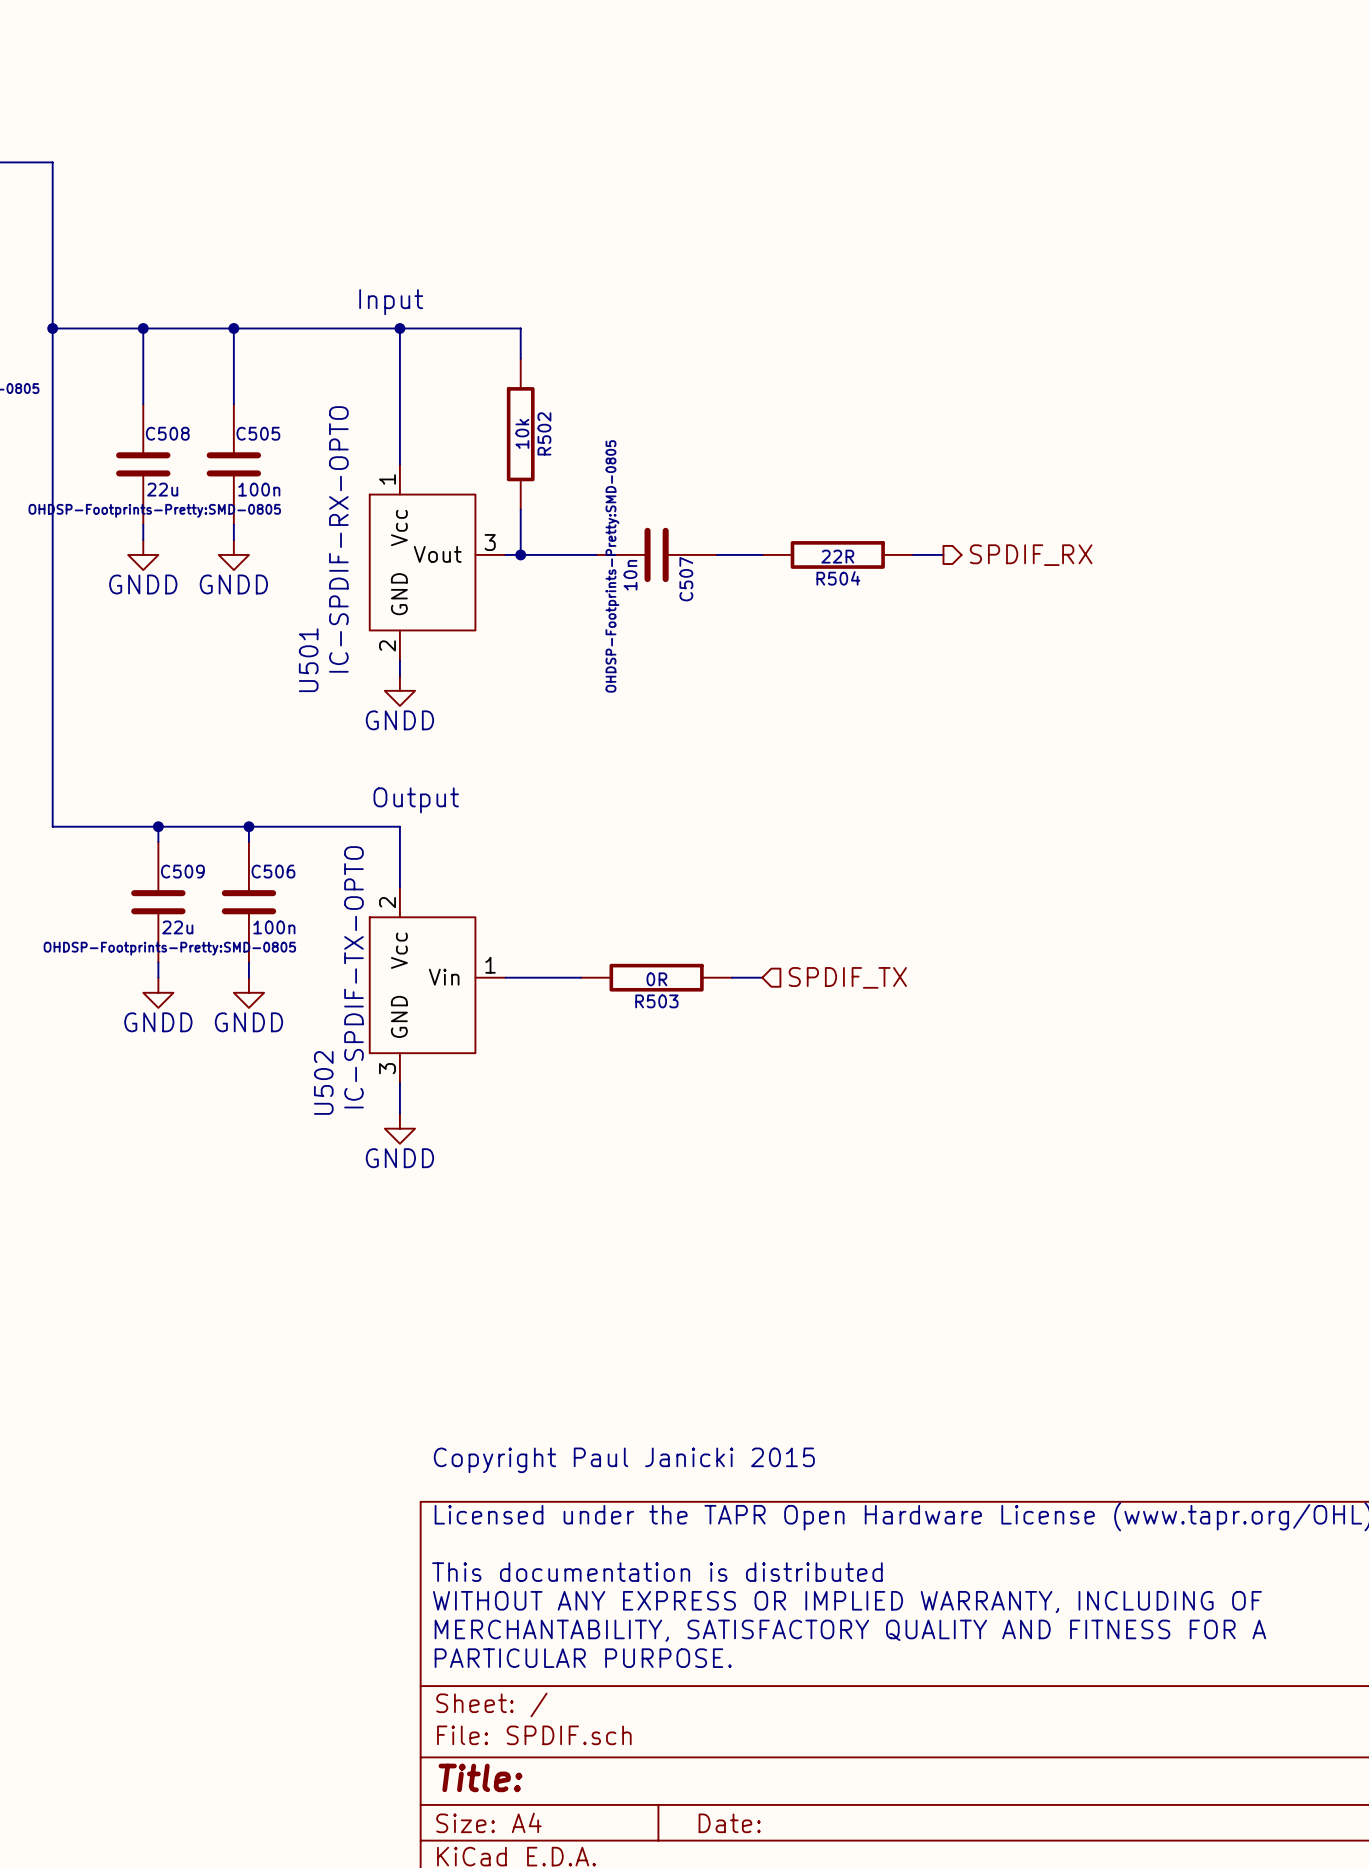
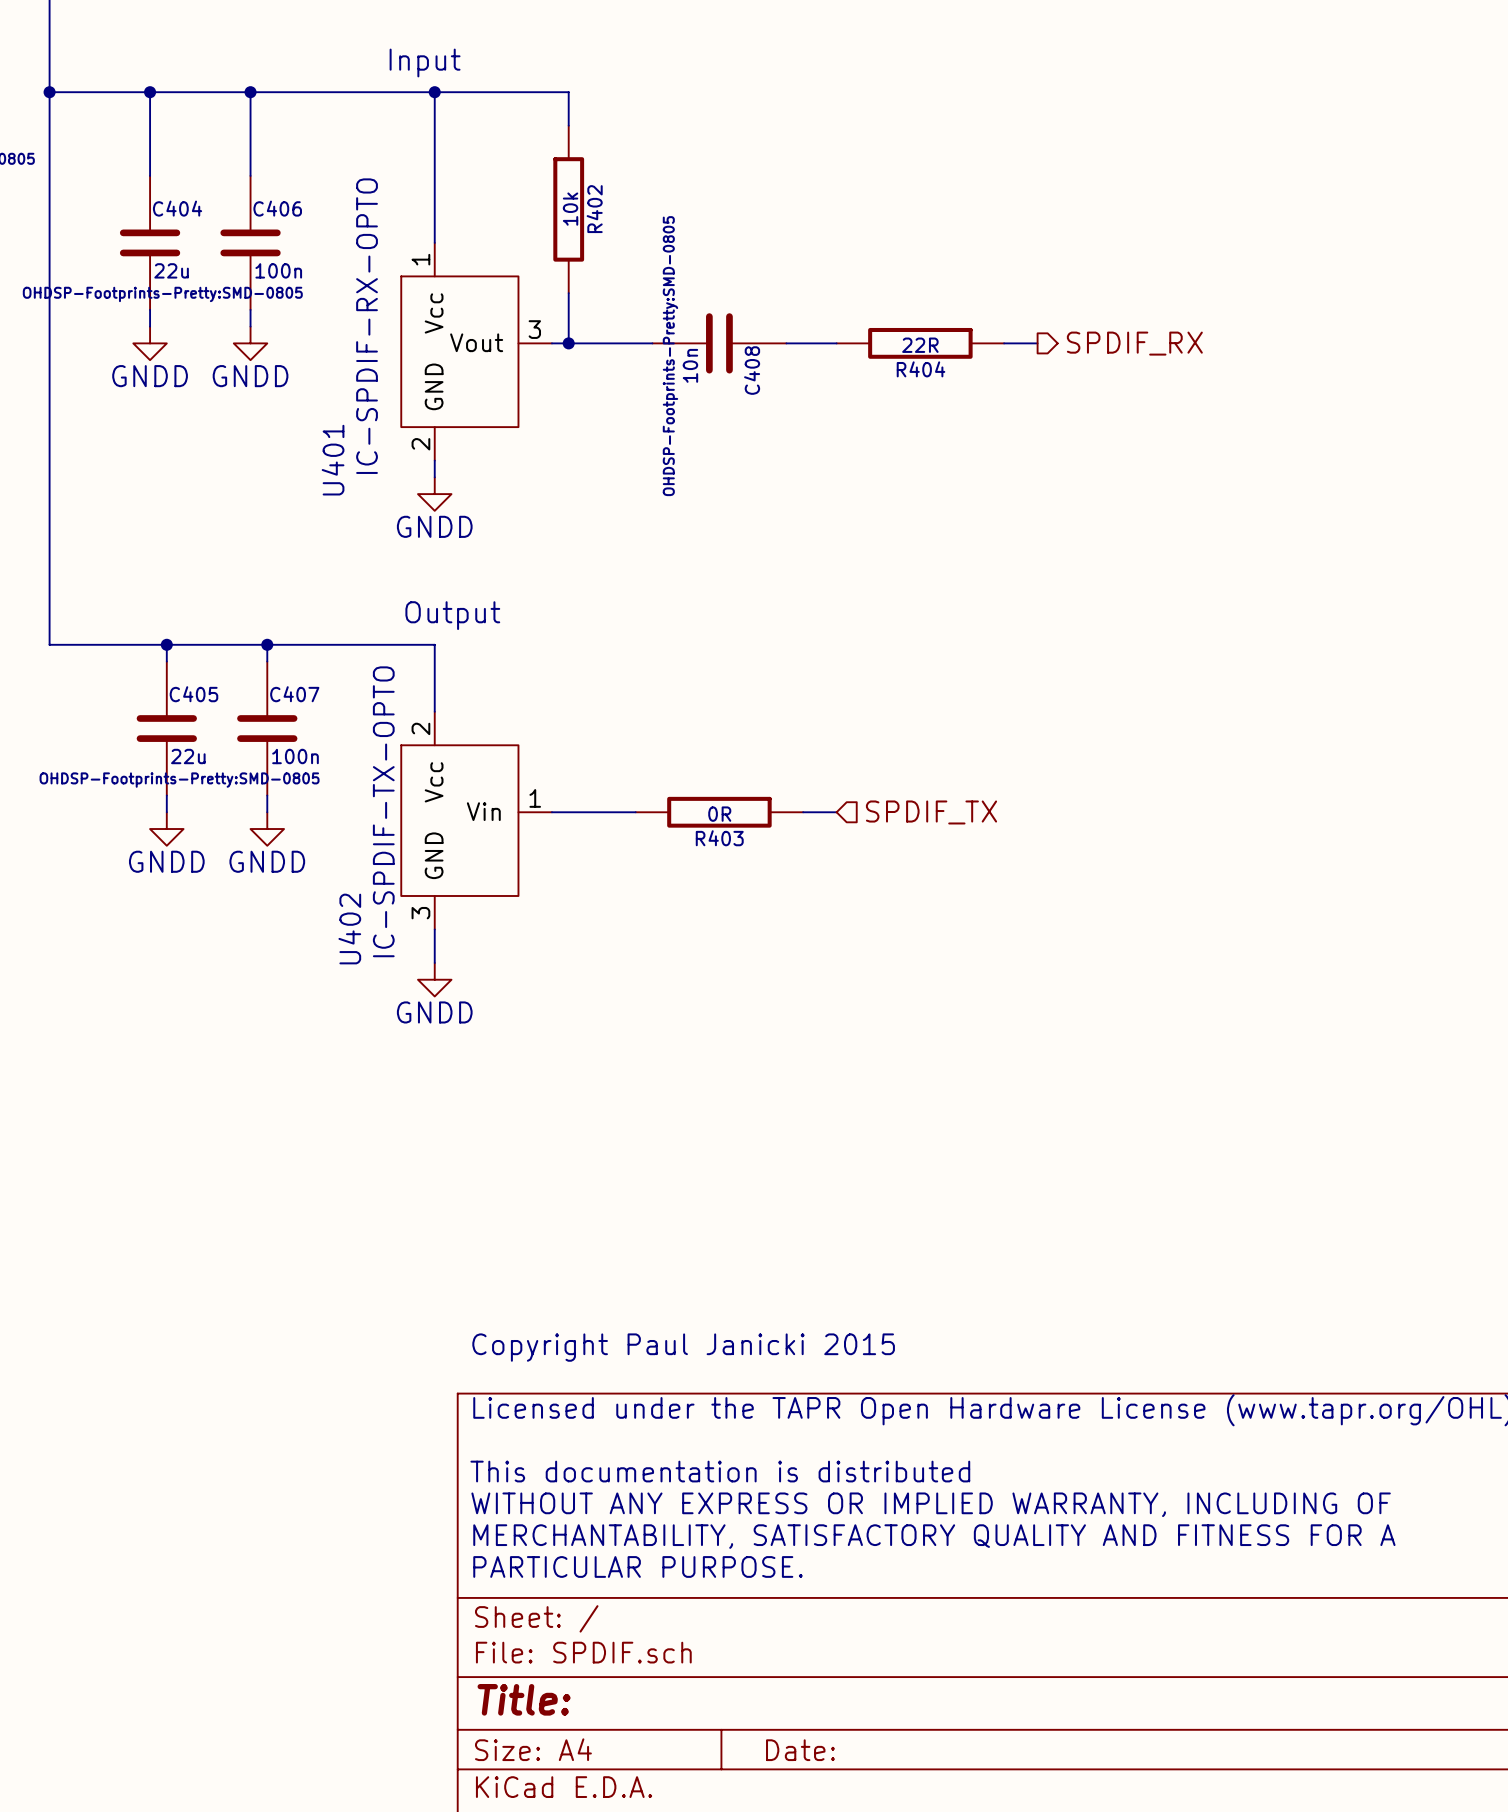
C508 name: C508 (167, 433) -> C404 (177, 208)
C505 name: C505 (258, 433) -> C406 (277, 208)
R502 name: R502 (544, 433) -> R402 (594, 209)
R504 name: R504 (838, 578) -> R404 (921, 369)
C507 name: C507 (686, 579) -> C408 (752, 370)
U501 name: U501 (308, 660) -> U401 (333, 460)
C509 name: C509 (182, 871) -> C405 (193, 694)
C506 name: C506 (273, 871) -> C407 (294, 694)
R503 name: R503 (656, 1001) -> R403 (719, 838)
U502 name: U502 (323, 1082) -> U402 (349, 929)

